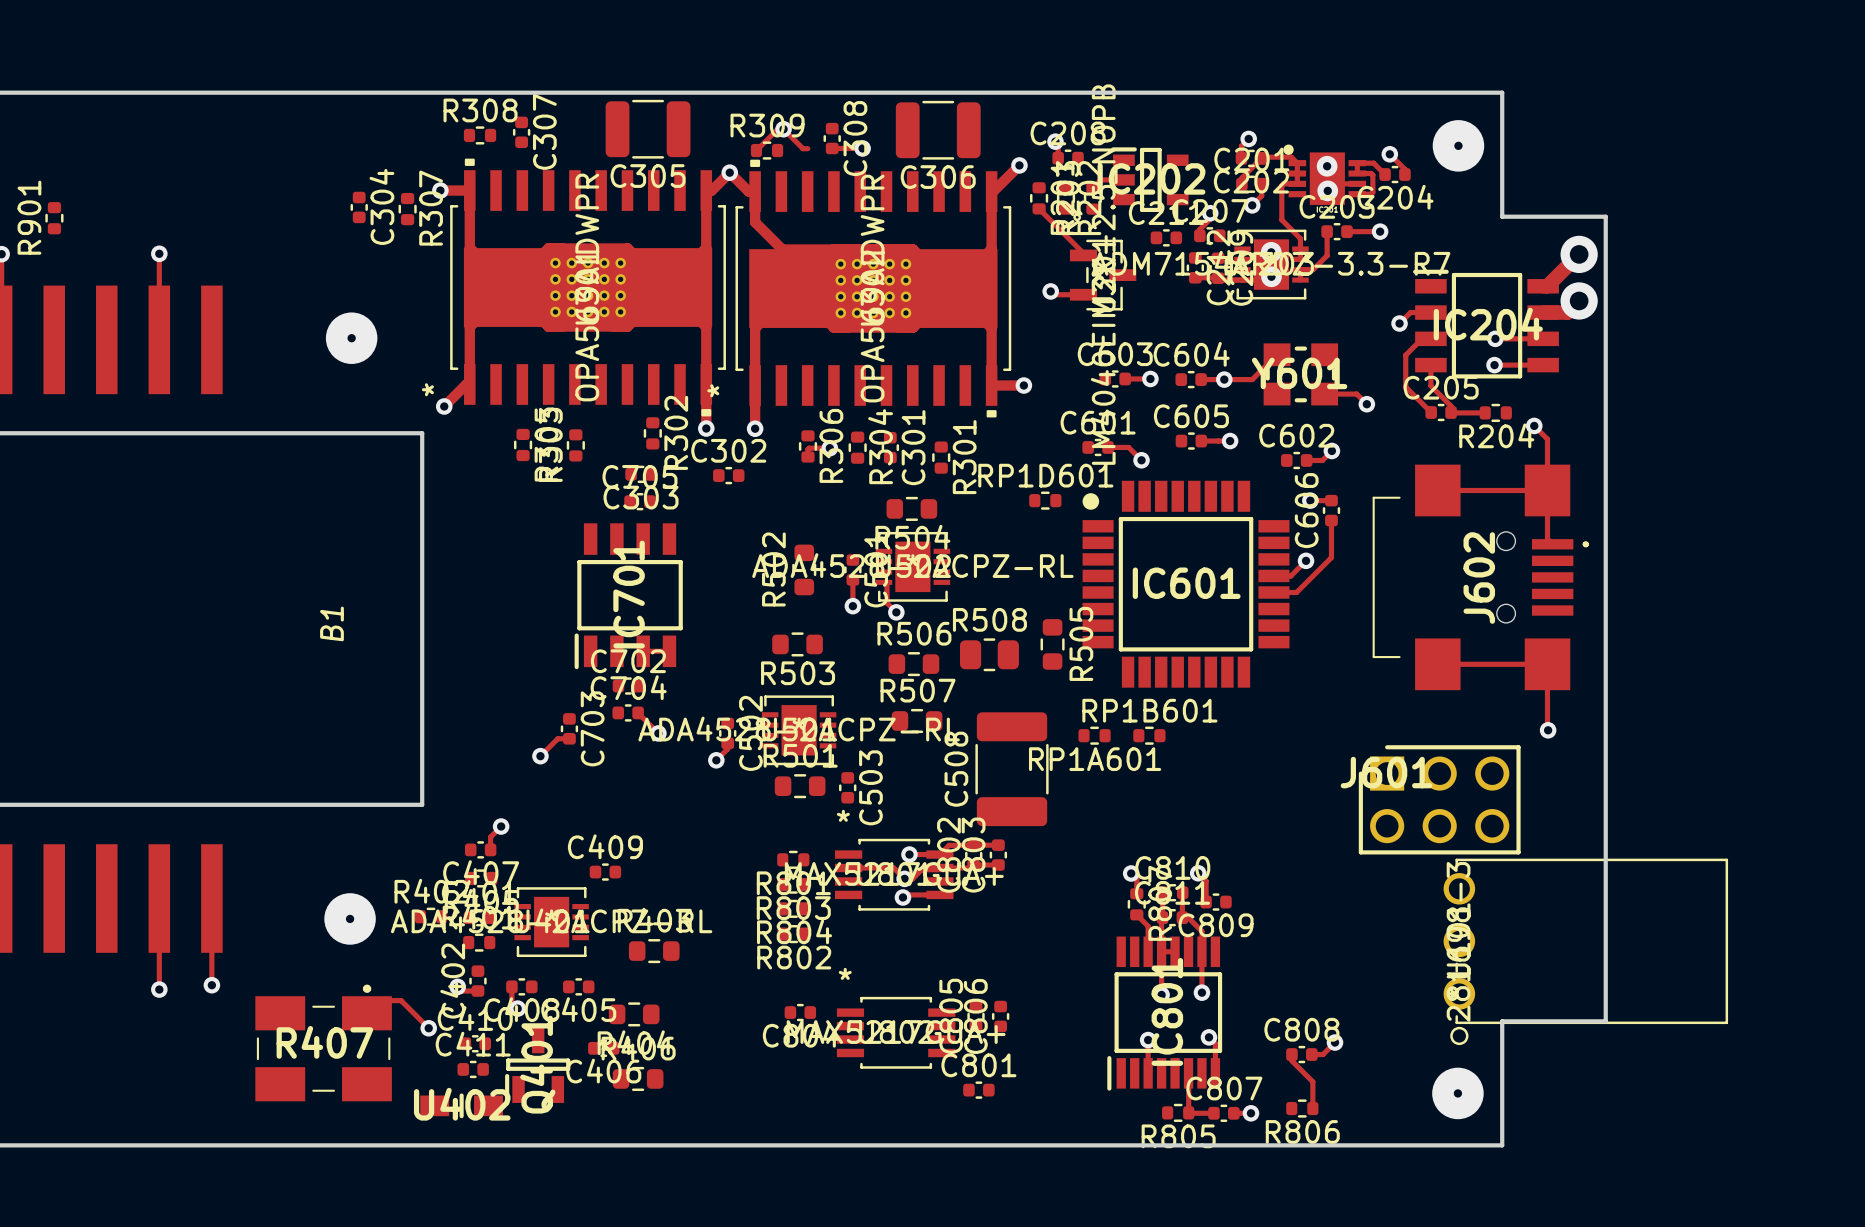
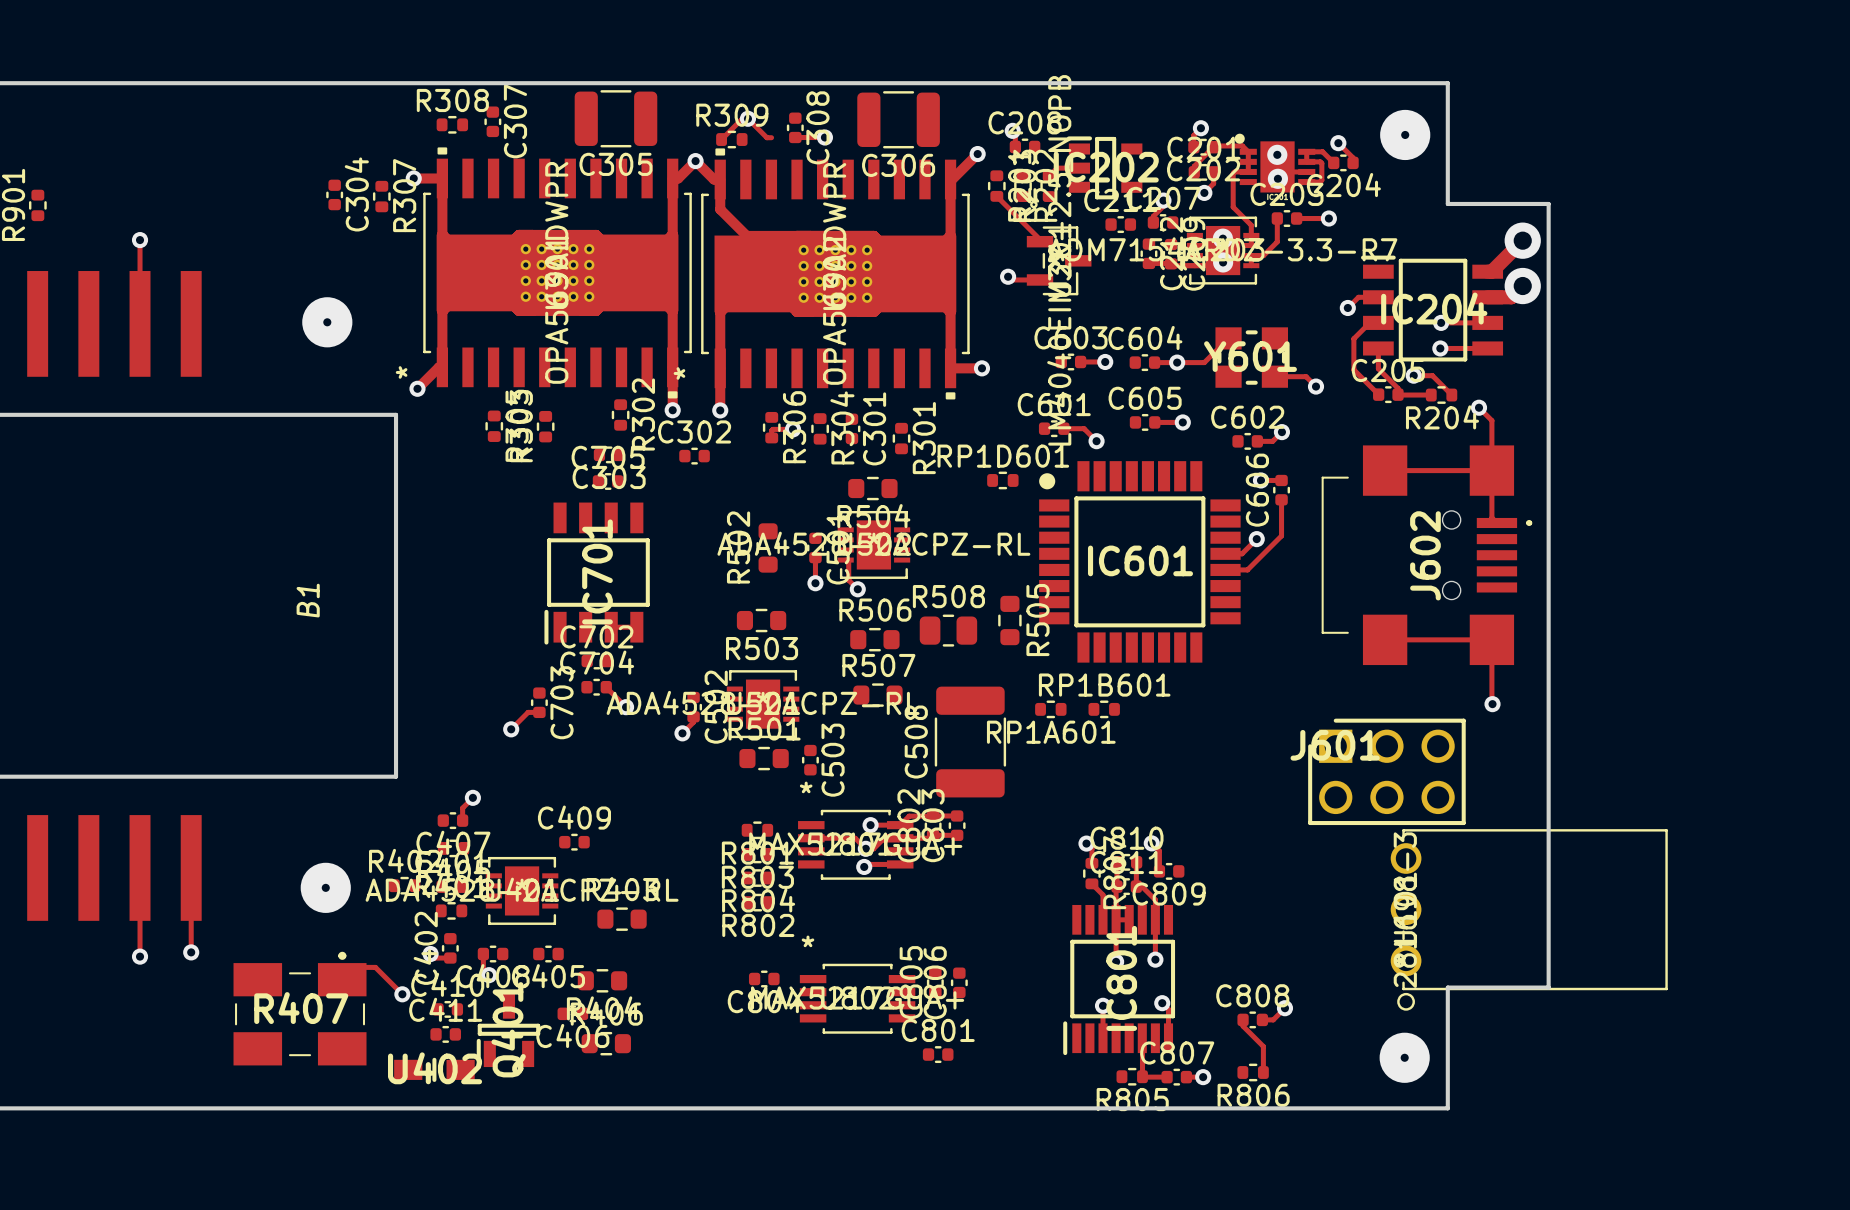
track: none -> (1413, 375) (1432, 375) (1451, 395)
via: none -> (1413, 375)

